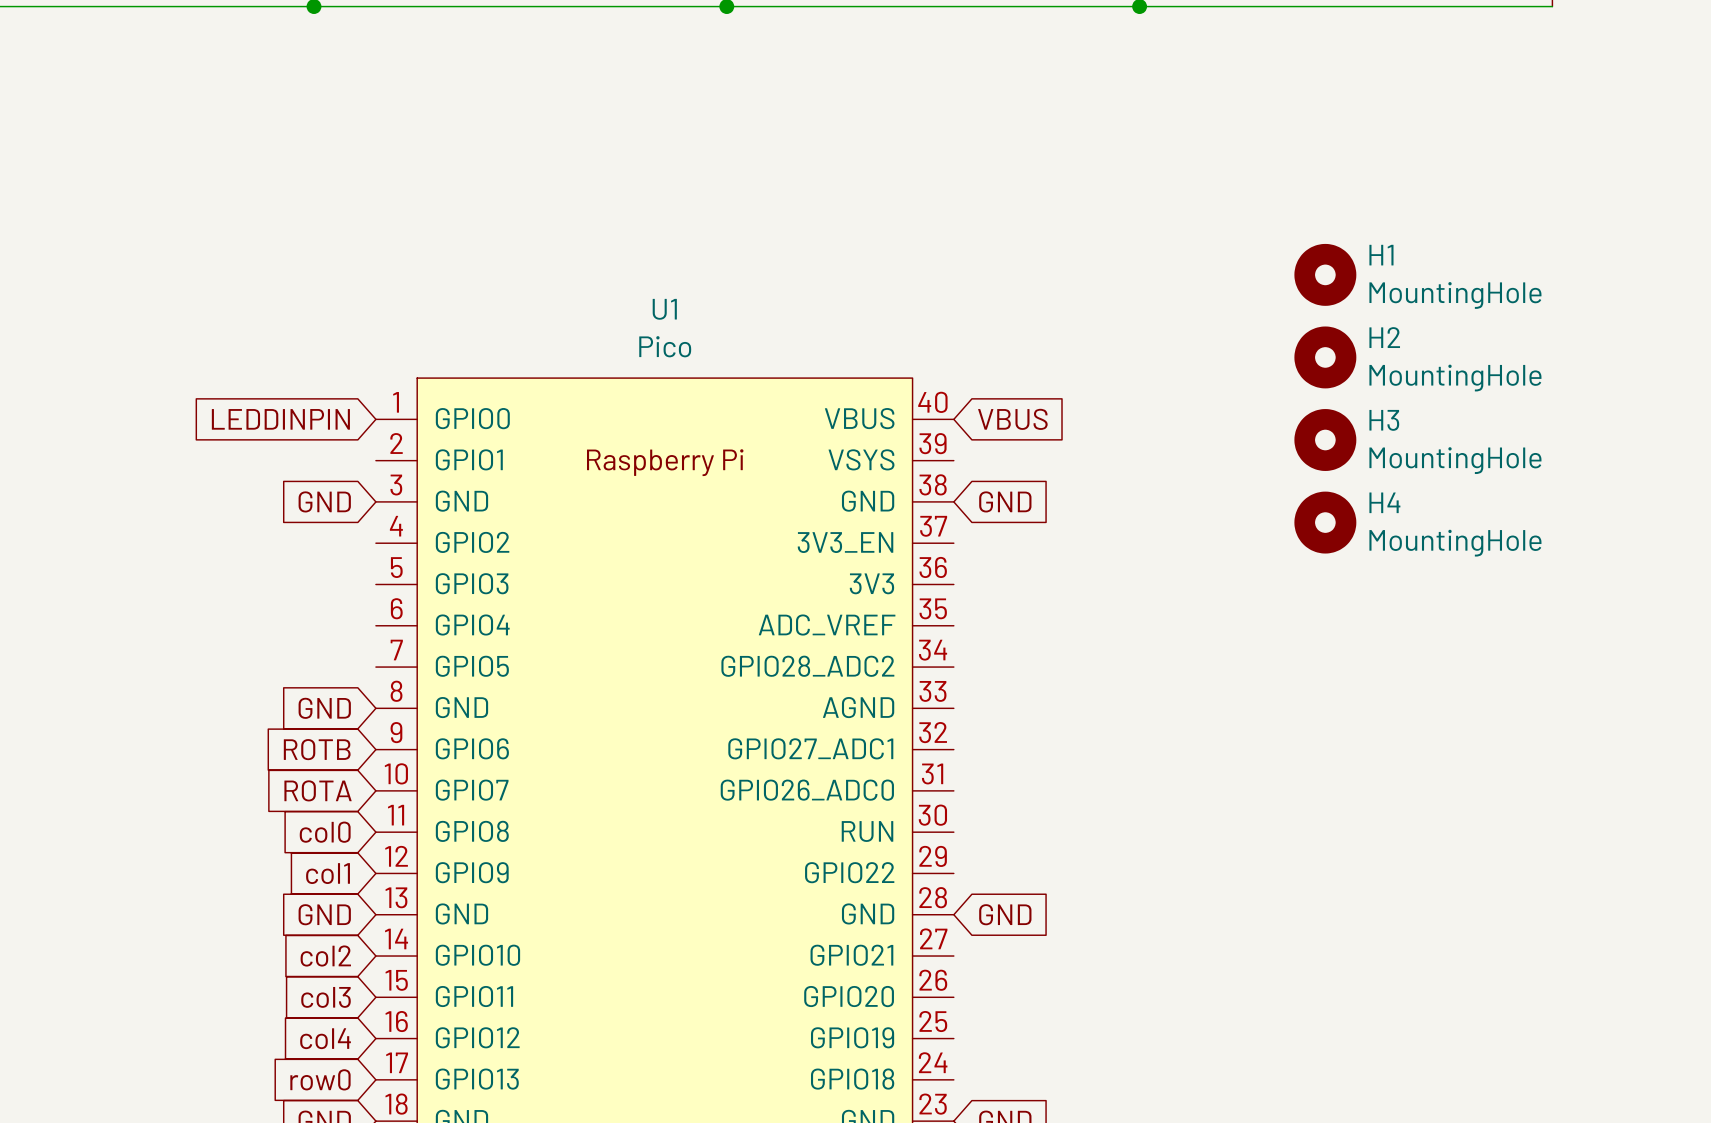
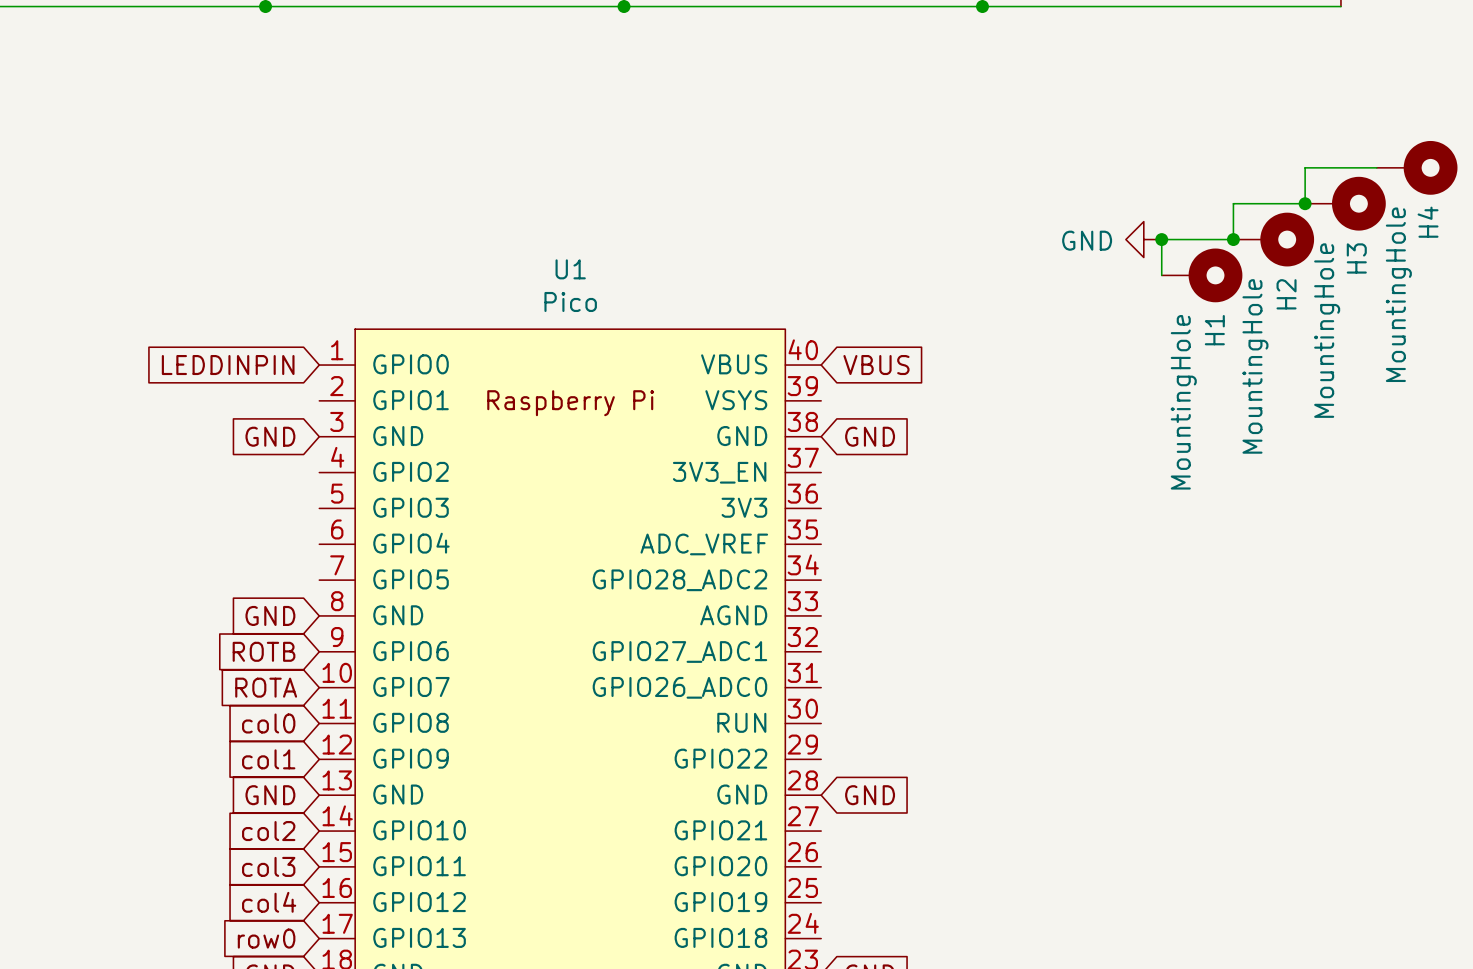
wire: none -> (1376, 167) (1305, 167) (1305, 203) (1233, 203) (1233, 239) (1161, 239) (1161, 275)
junction: none -> (1305, 203)
H1 symbol: [1294, 243, 1357, 306] -> [1161, 248, 1243, 303]
H1 name position: H1 (1381, 255) -> H1 (1214, 330)
power symbol: none -> GND (1143, 239)
junction: none -> (1161, 239)
junction: none -> (1233, 239)
H1 value position: MountingHole (1455, 295) -> MountingHole (1183, 402)
H2 symbol: [1294, 326, 1357, 389] -> [1233, 212, 1315, 267]
H2 name position: H2 (1384, 337) -> H2 (1286, 294)
H2 value position: MountingHole (1455, 378) -> MountingHole (1255, 366)
H3 symbol: [1294, 409, 1357, 471] -> [1305, 176, 1386, 231]
H3 name position: H3 (1384, 420) -> H3 (1356, 258)
H3 value position: MountingHole (1455, 460) -> MountingHole (1327, 330)
H4 symbol: [1294, 491, 1357, 554] -> [1376, 140, 1458, 195]
H4 name position: H4 (1384, 502) -> H4 (1428, 222)
H4 value position: MountingHole (1455, 543) -> MountingHole (1398, 294)

